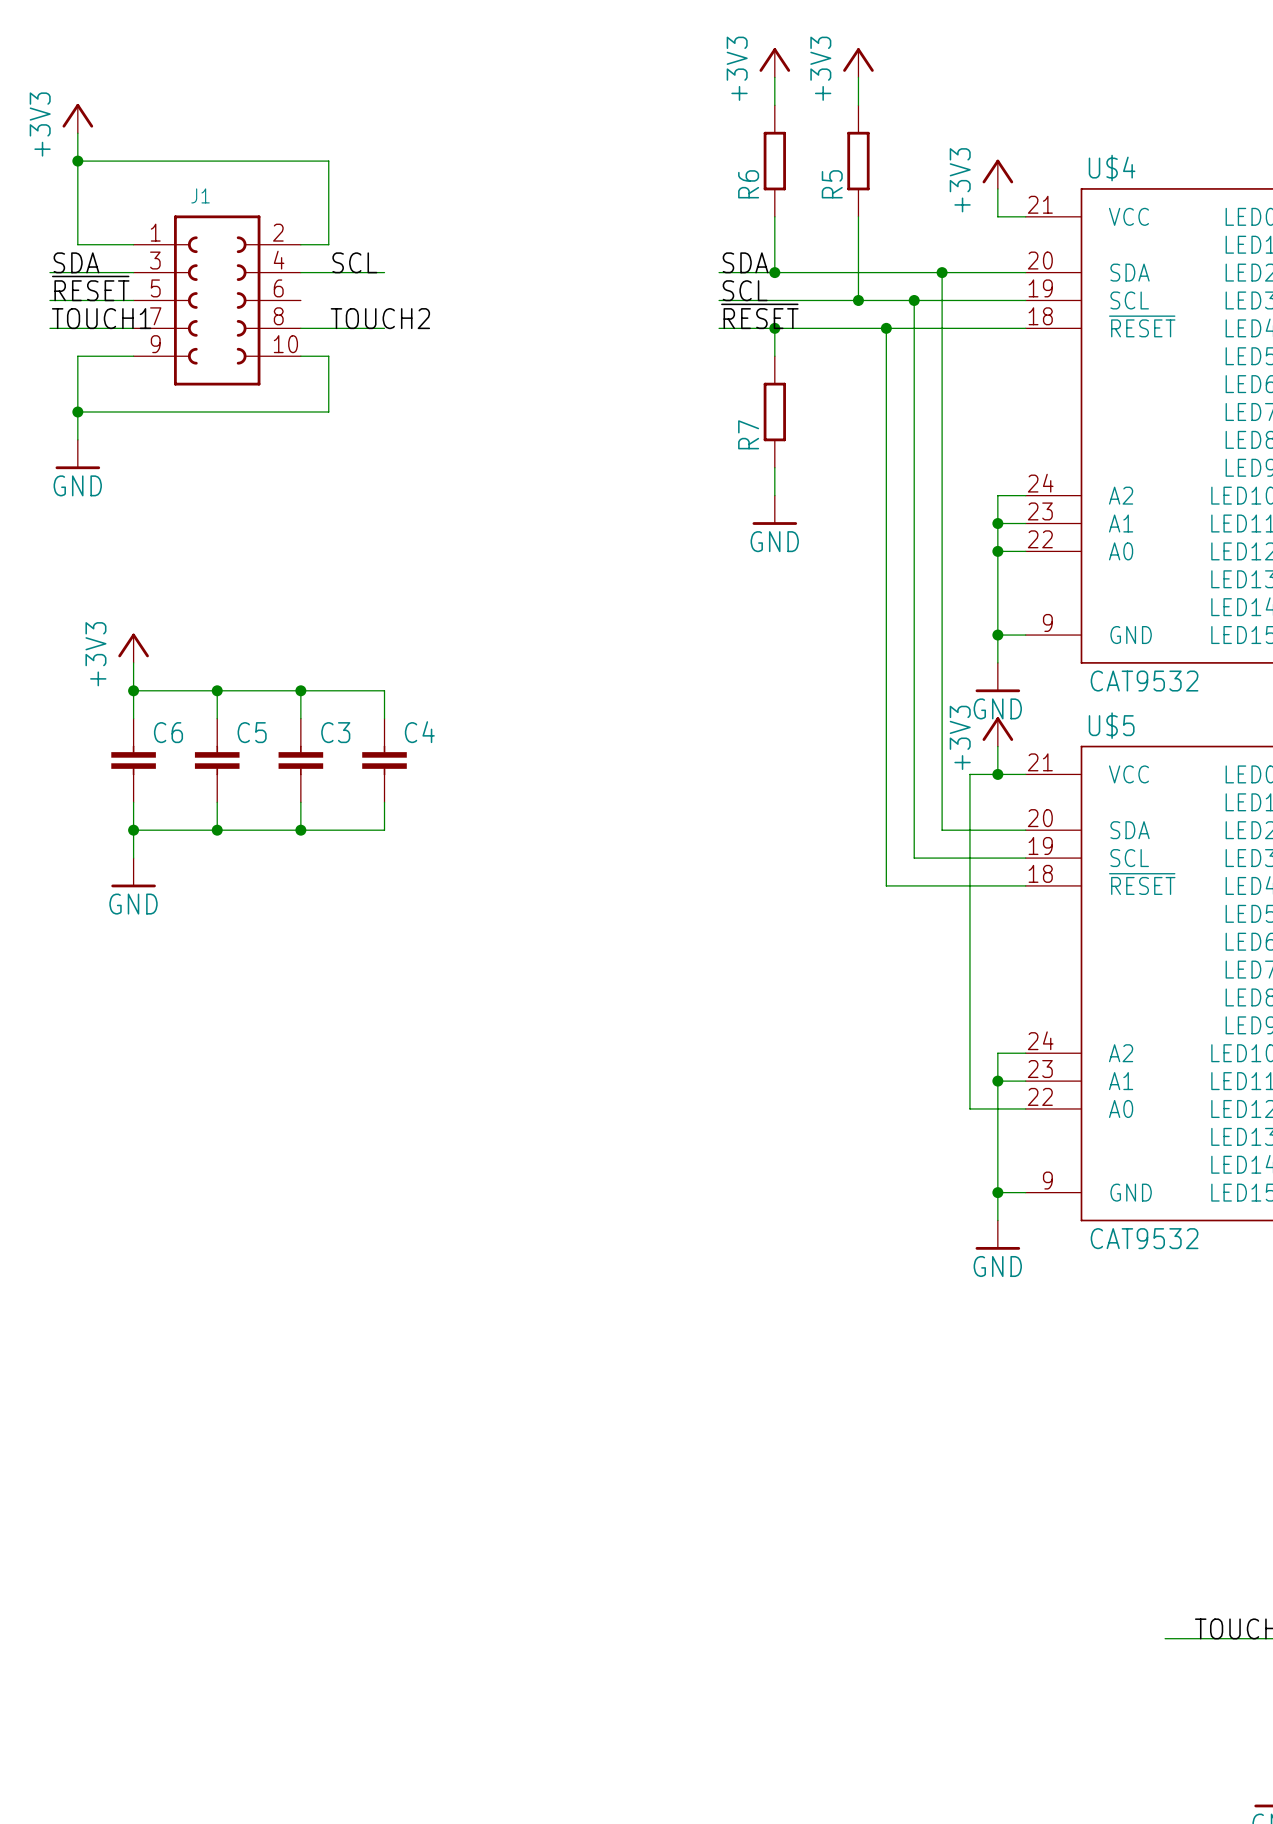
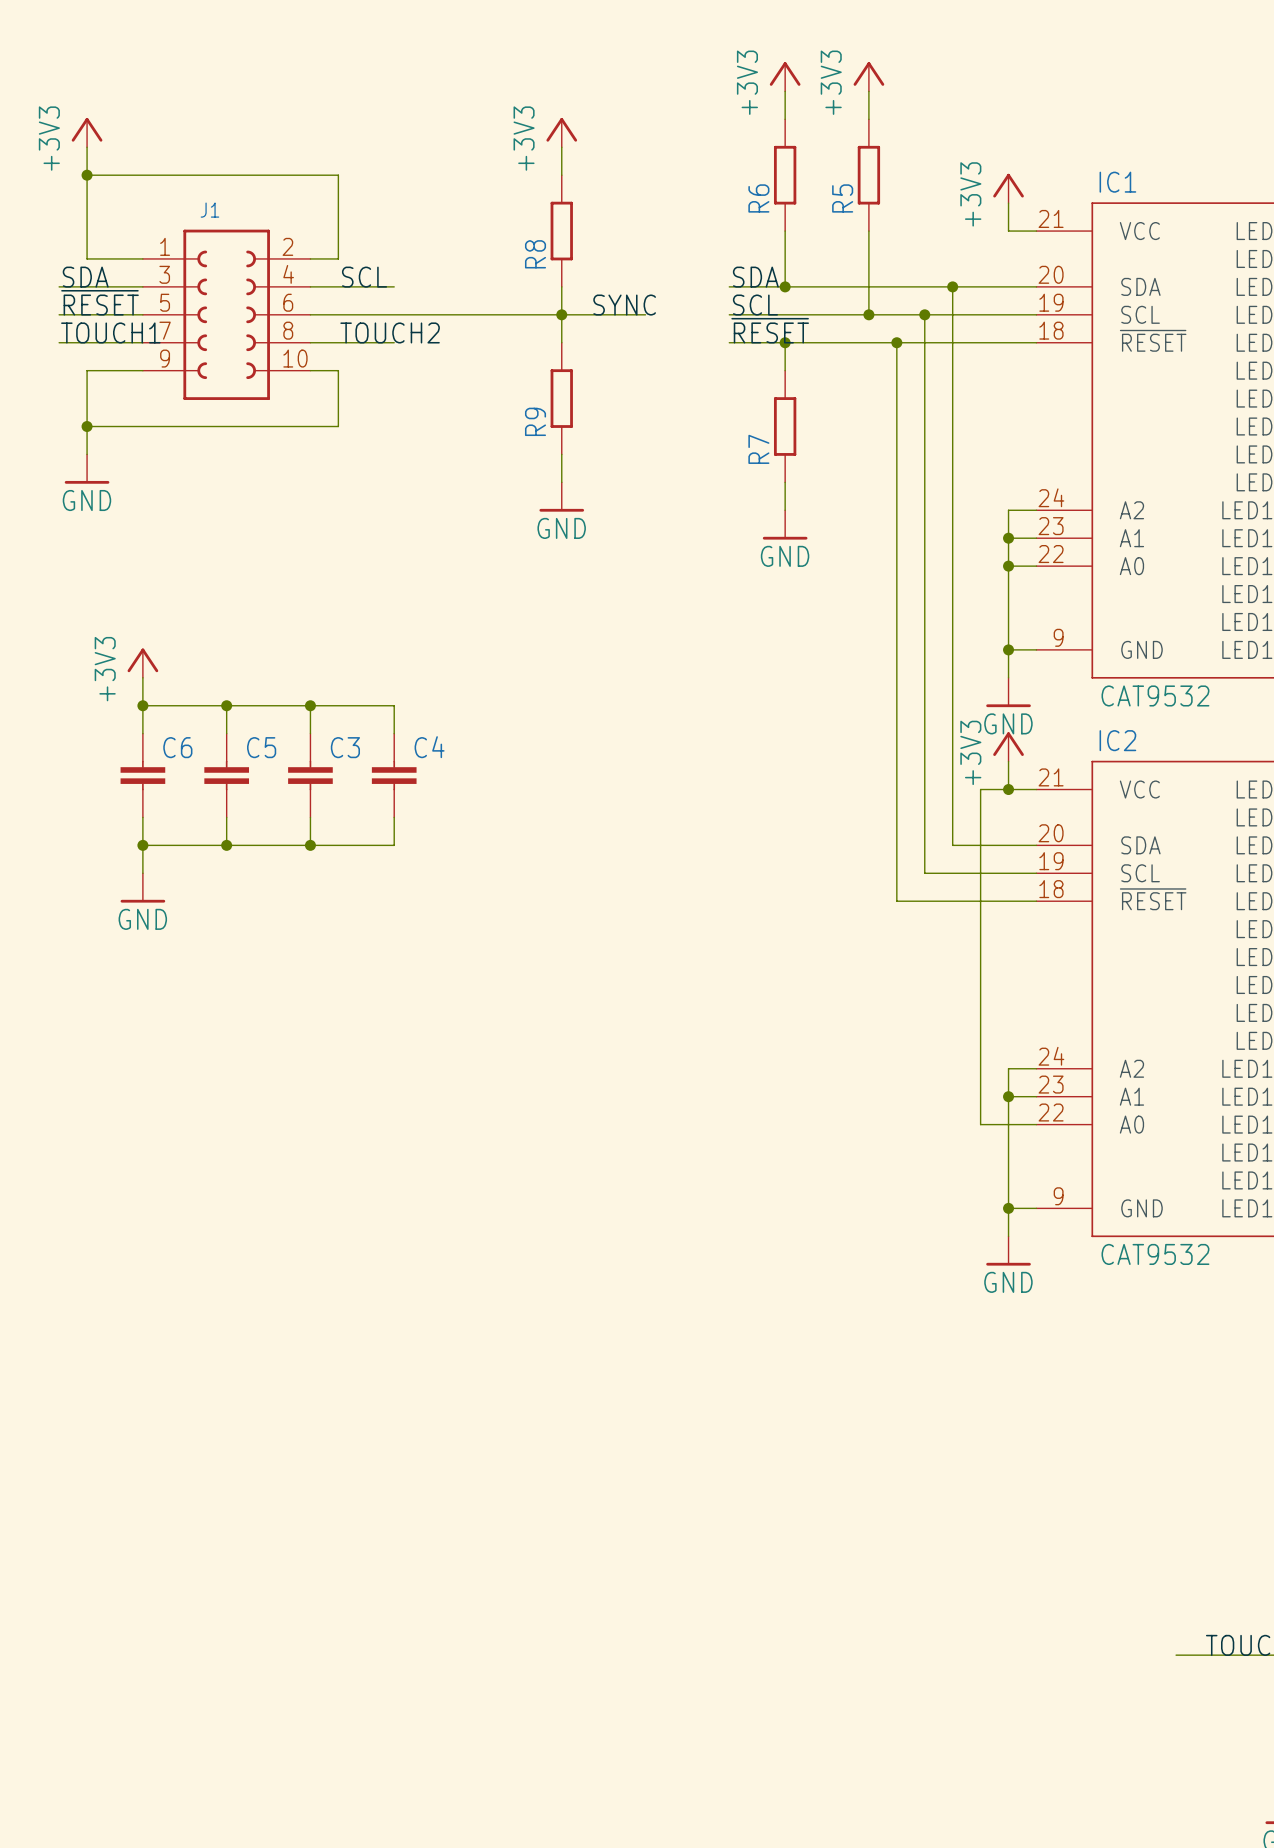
power symbol: none -> +3V3 (561, 132)
wire: none -> (561, 147) (561, 175)
U$4 name: U$4 (1112, 168) -> IC1 (1117, 182)
R8: none -> (561, 231)
wire: none -> (561, 286) (561, 342)
label: none -> SYNC (624, 305)
wire: none -> (310, 314) (645, 314)
junction: none -> (561, 314)
R9: none -> (561, 398)
wire: none -> (561, 454) (561, 482)
power symbol: none -> GND (561, 497)
U$5 name: U$5 (1111, 725) -> IC2 (1117, 740)

